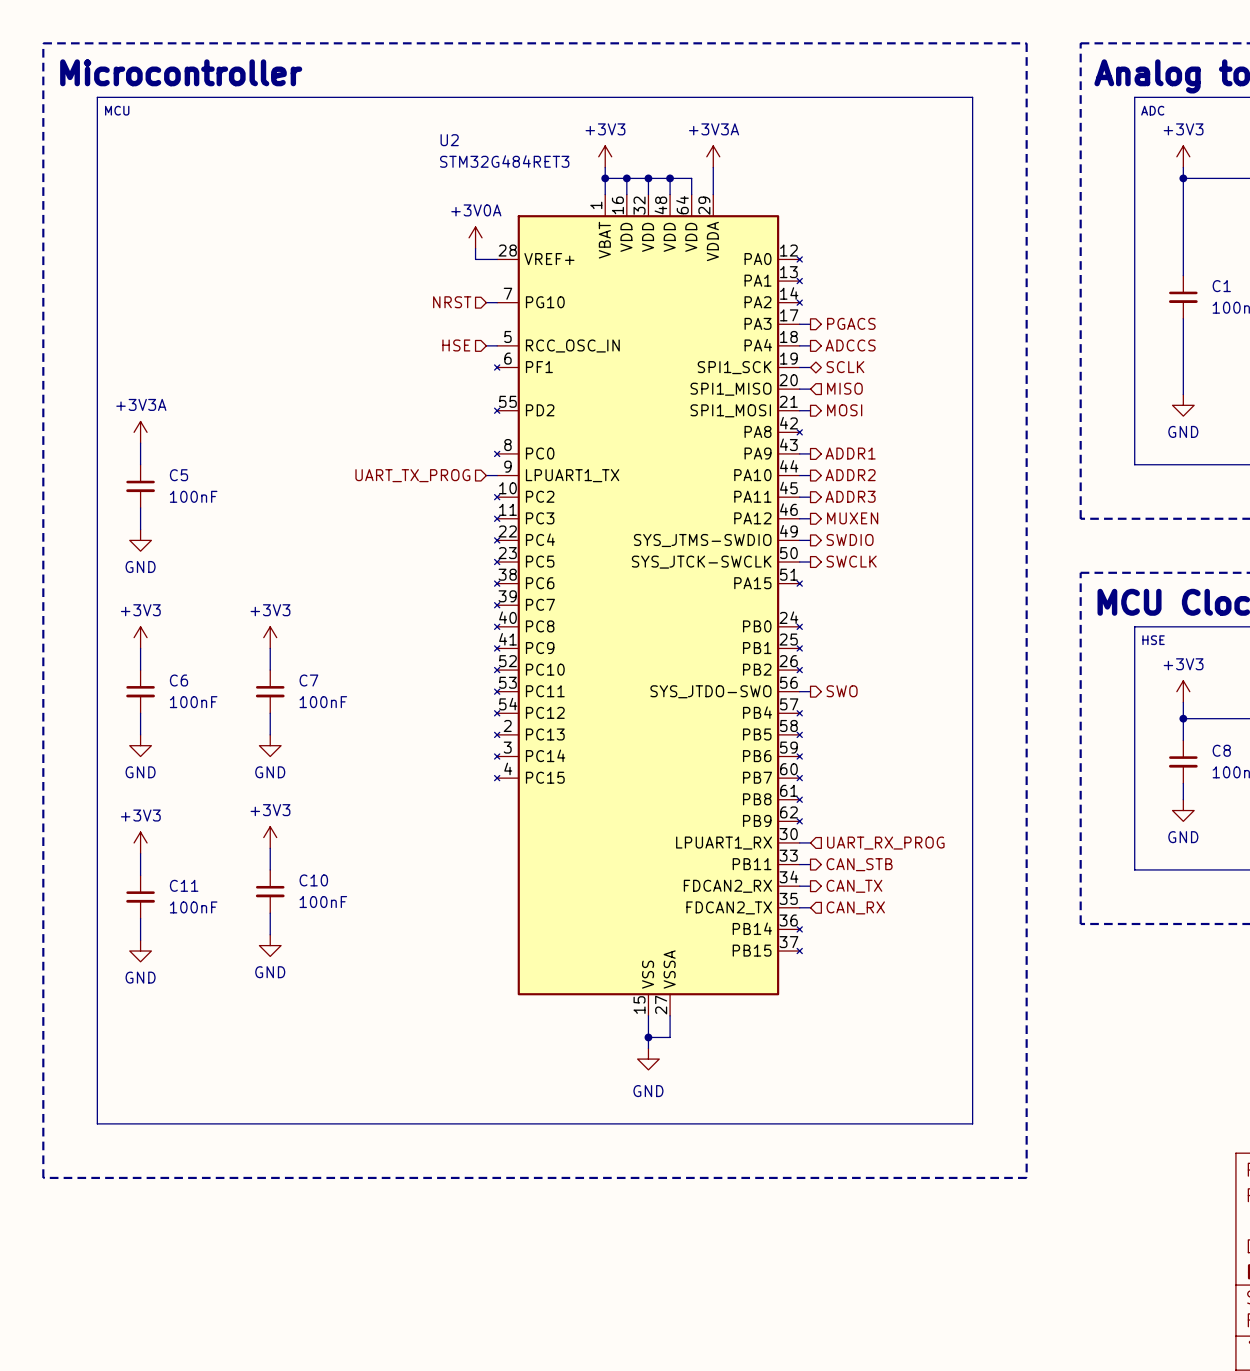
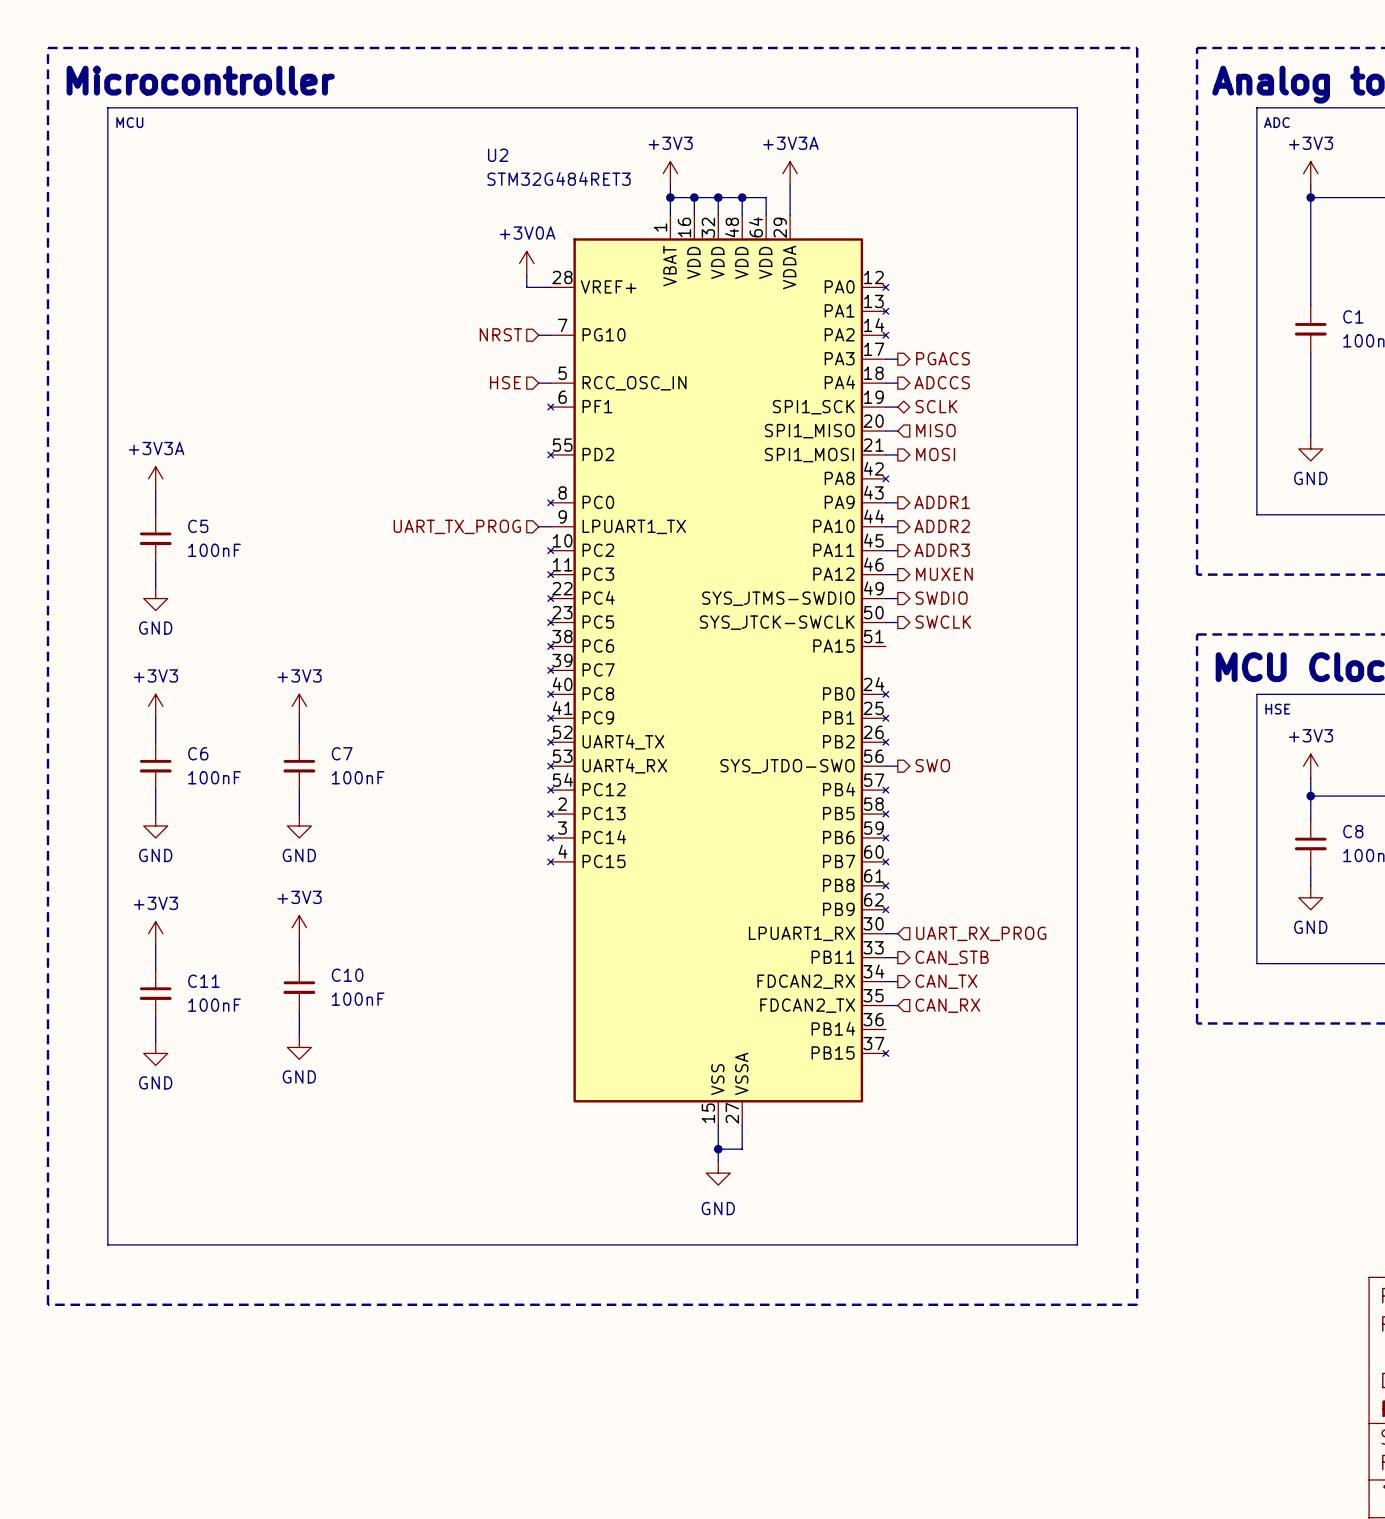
U2 symbol: [494, 194, 803, 1016] -> [547, 215, 889, 1126]

